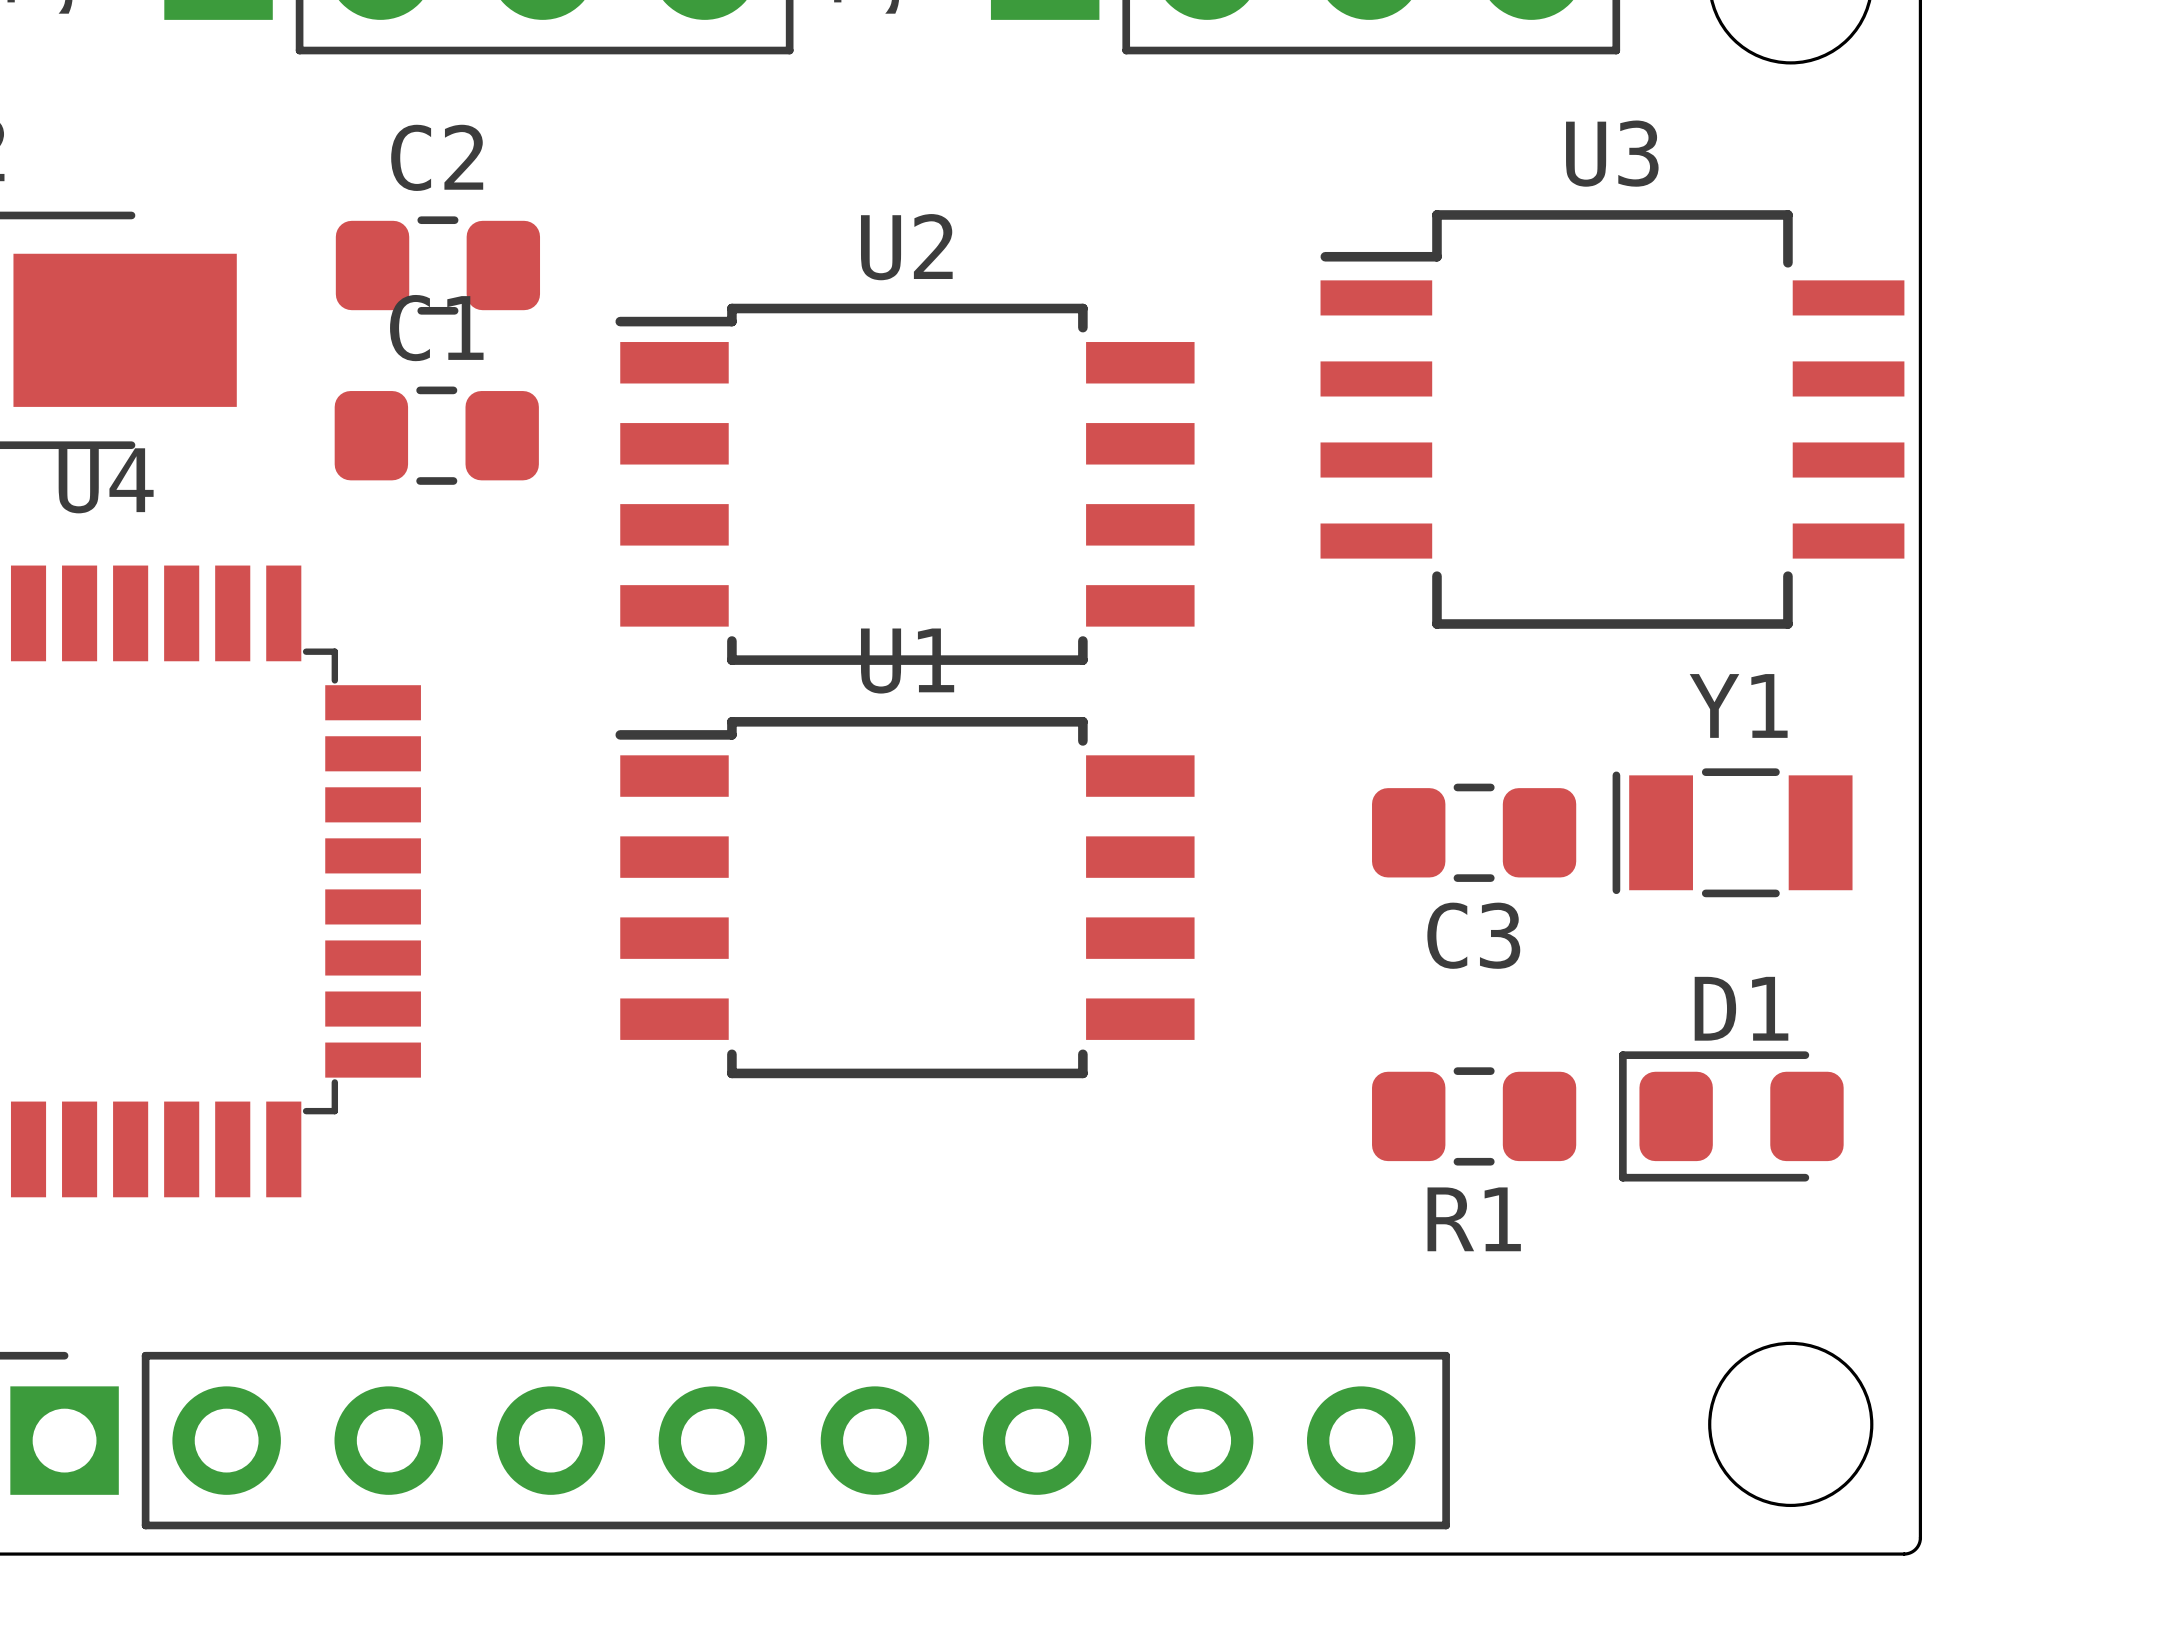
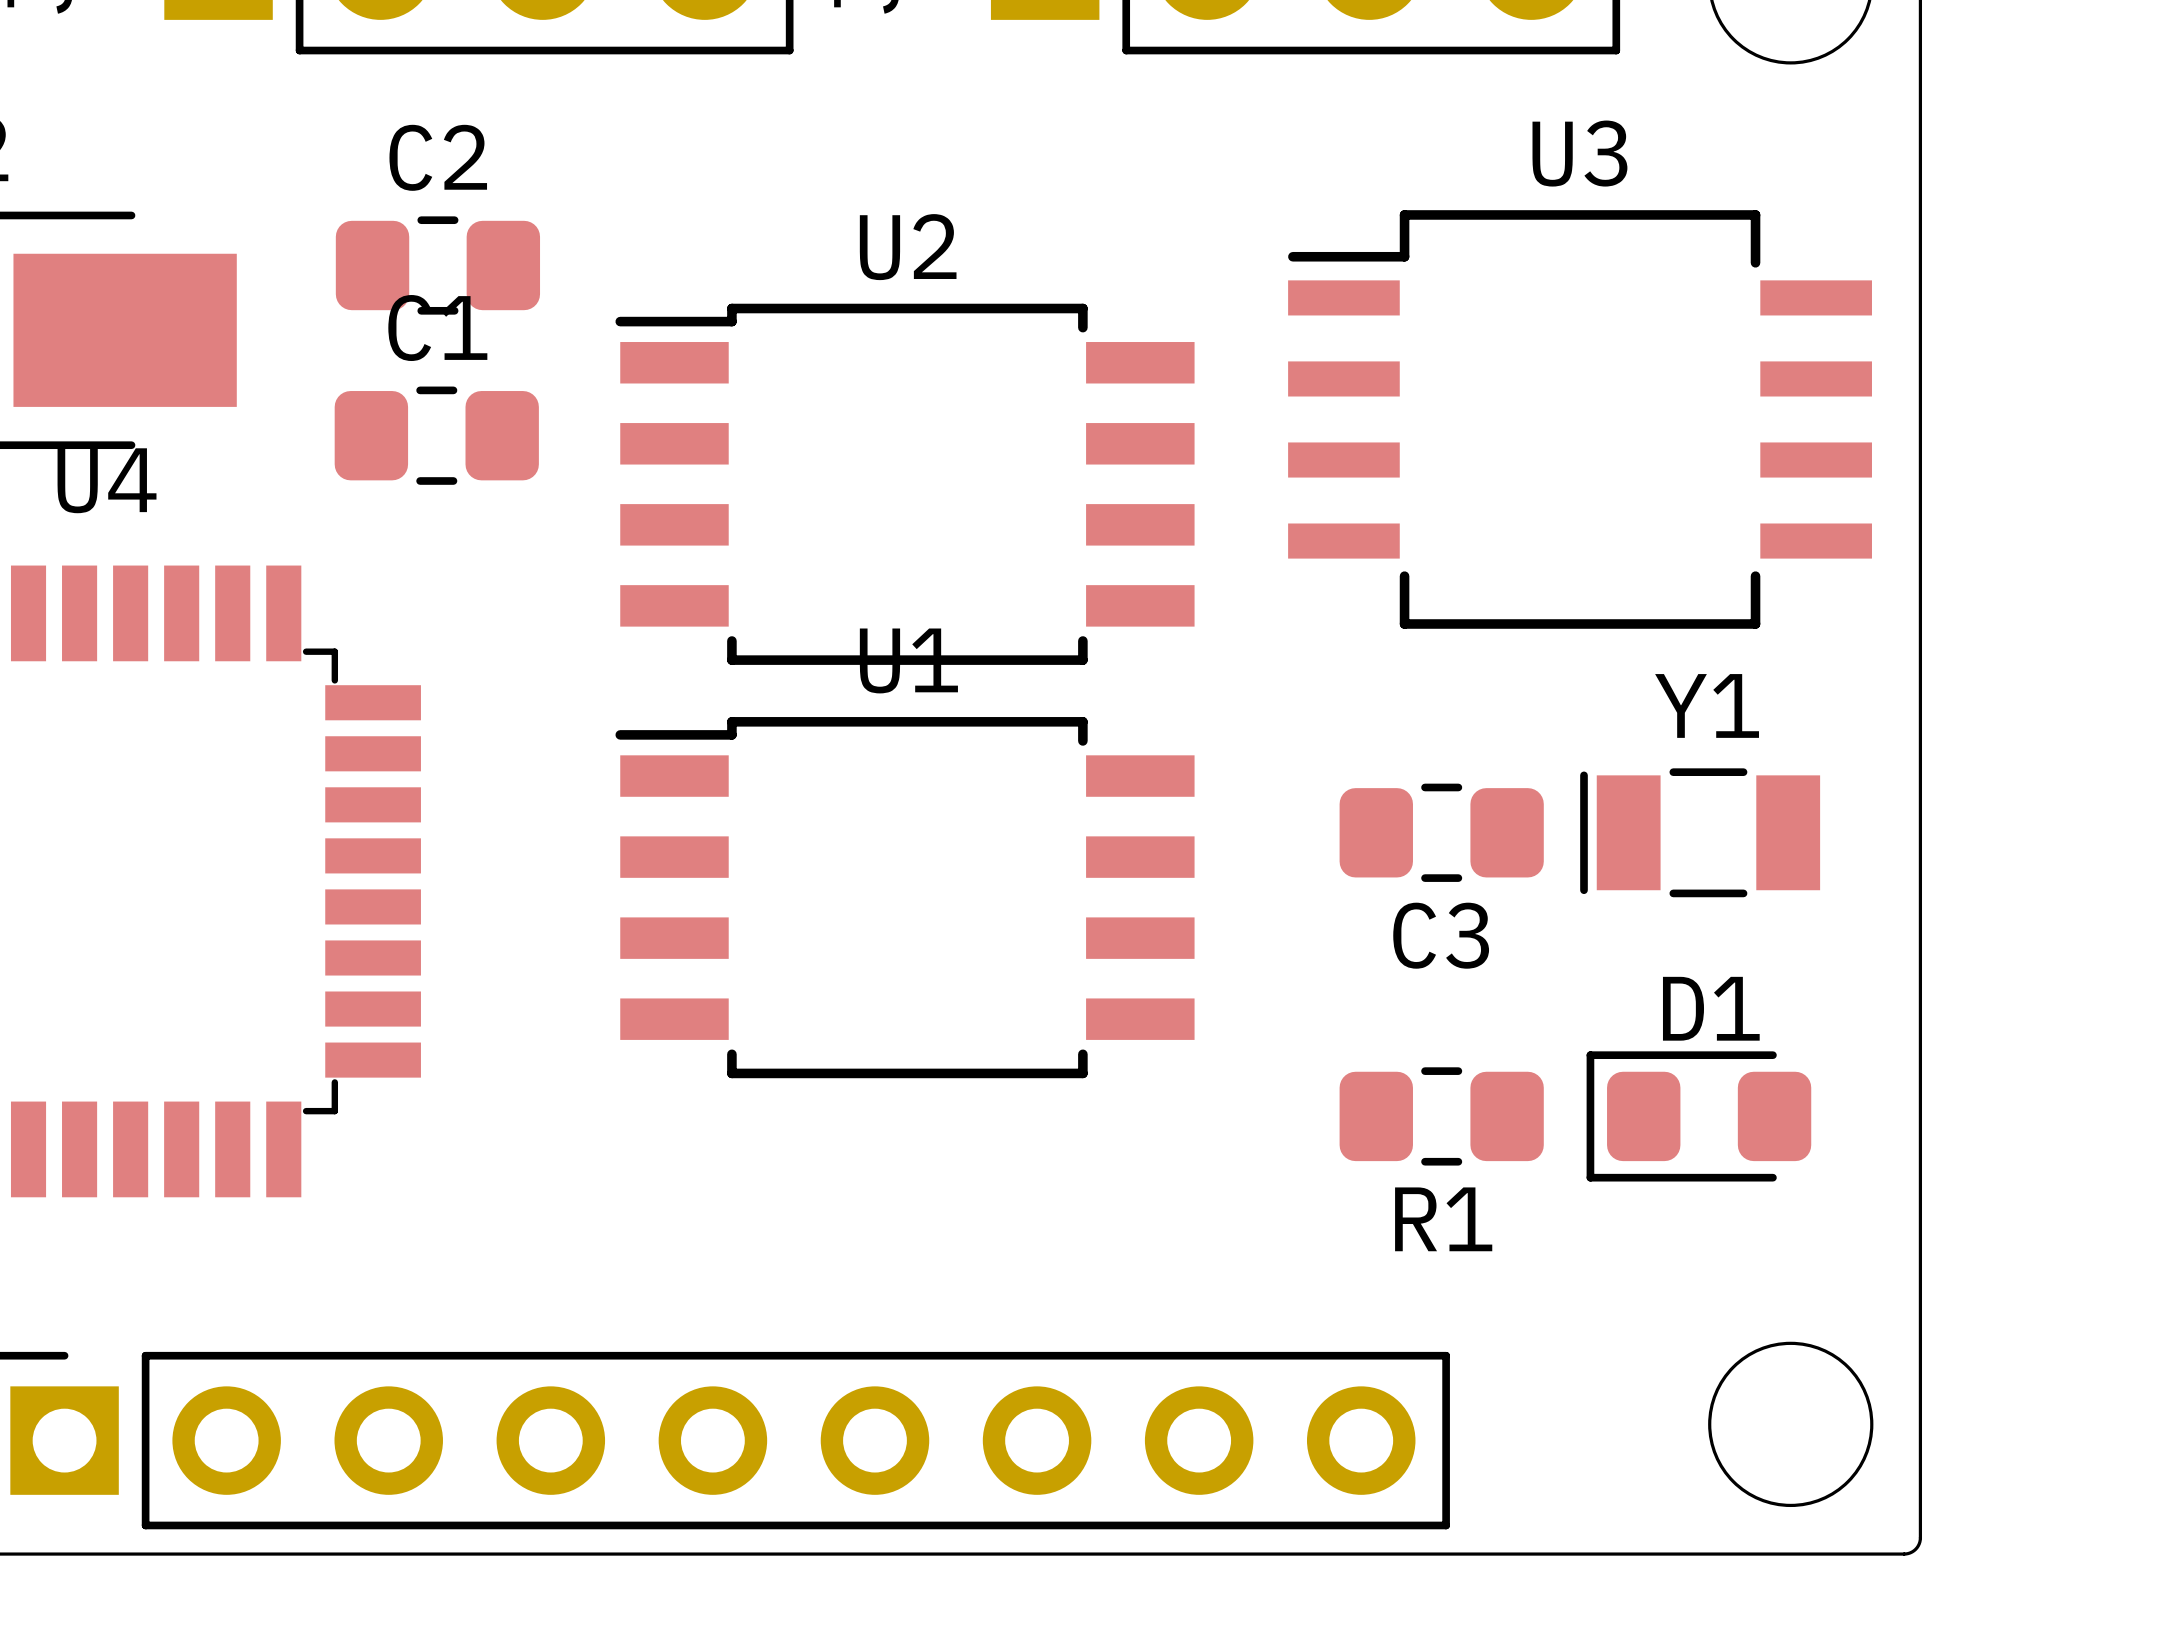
U3 position: (1612, 419) -> (1580, 419)
C3 position: (1474, 832) -> (1441, 832)
Y1 position: (1732, 832) -> (1700, 832)
R1 position: (1474, 1116) -> (1441, 1116)
D1 position: (1731, 1116) -> (1698, 1116)

